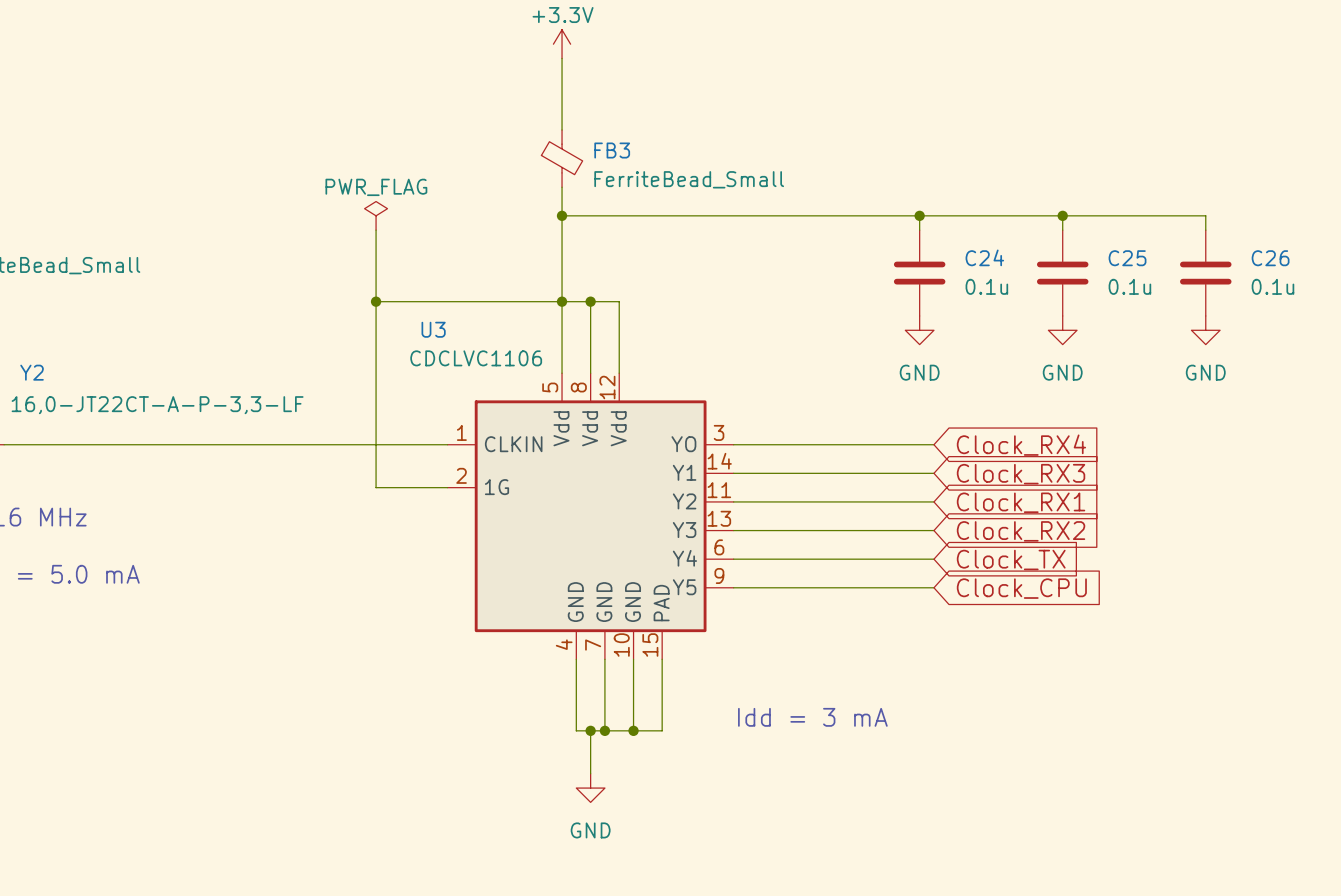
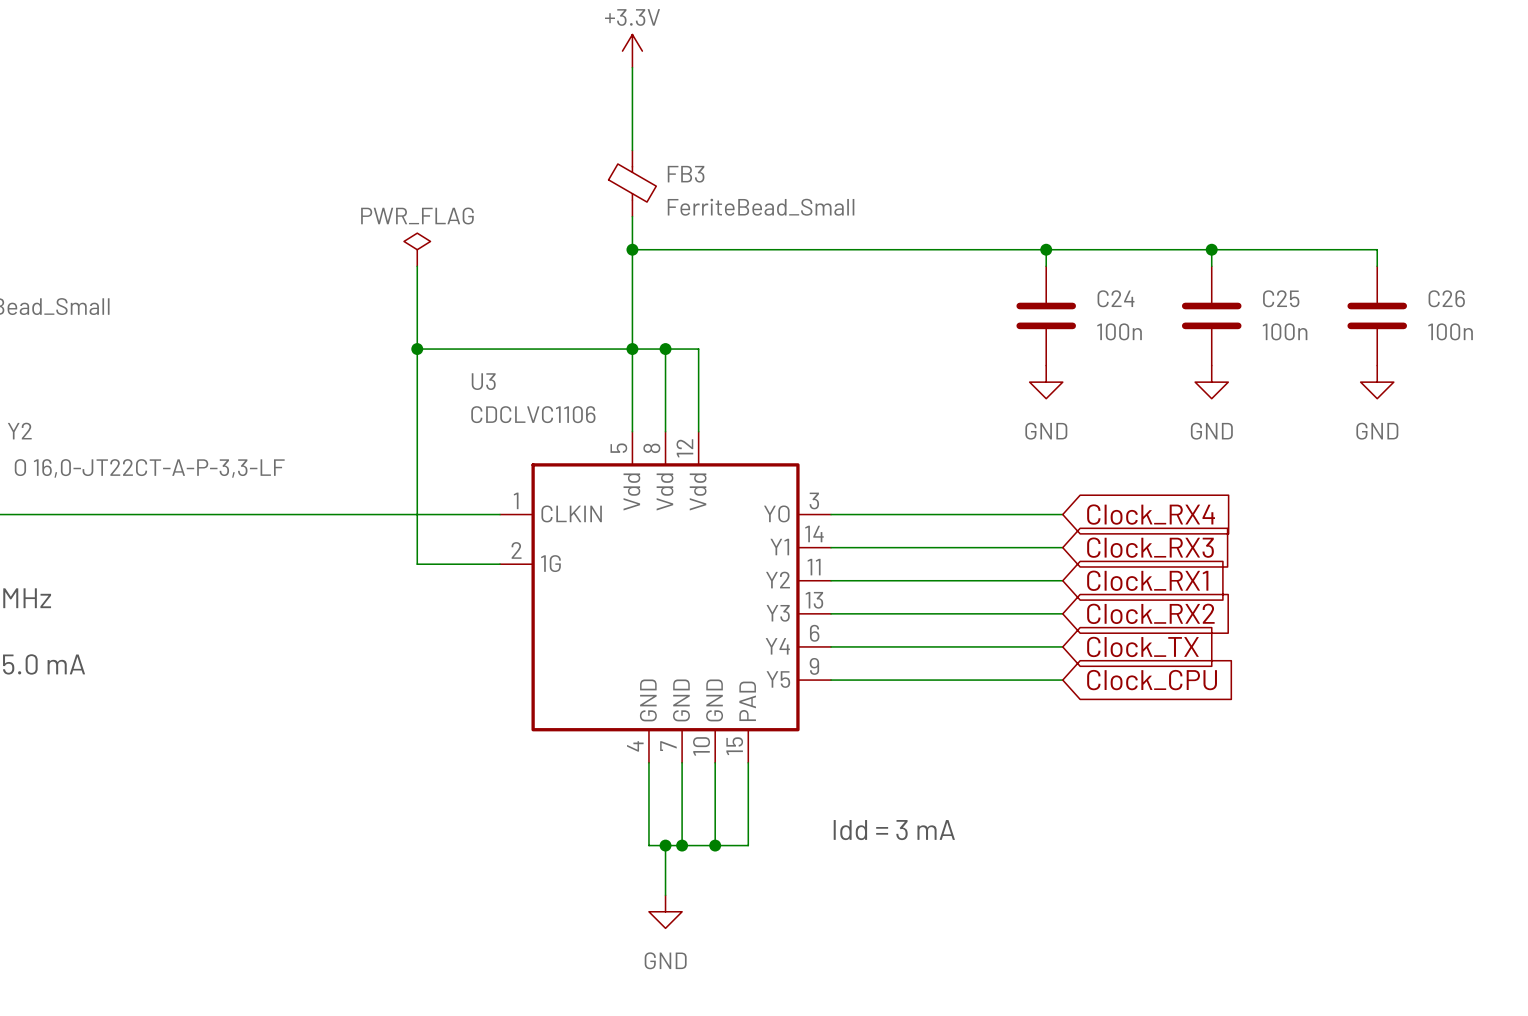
C24 value: 0.1u (986, 286) -> 100n (1119, 331)
C25 value: 0.1u (1129, 286) -> 100n (1285, 331)
C26 value: 0.1u (1272, 286) -> 100n (1450, 331)

